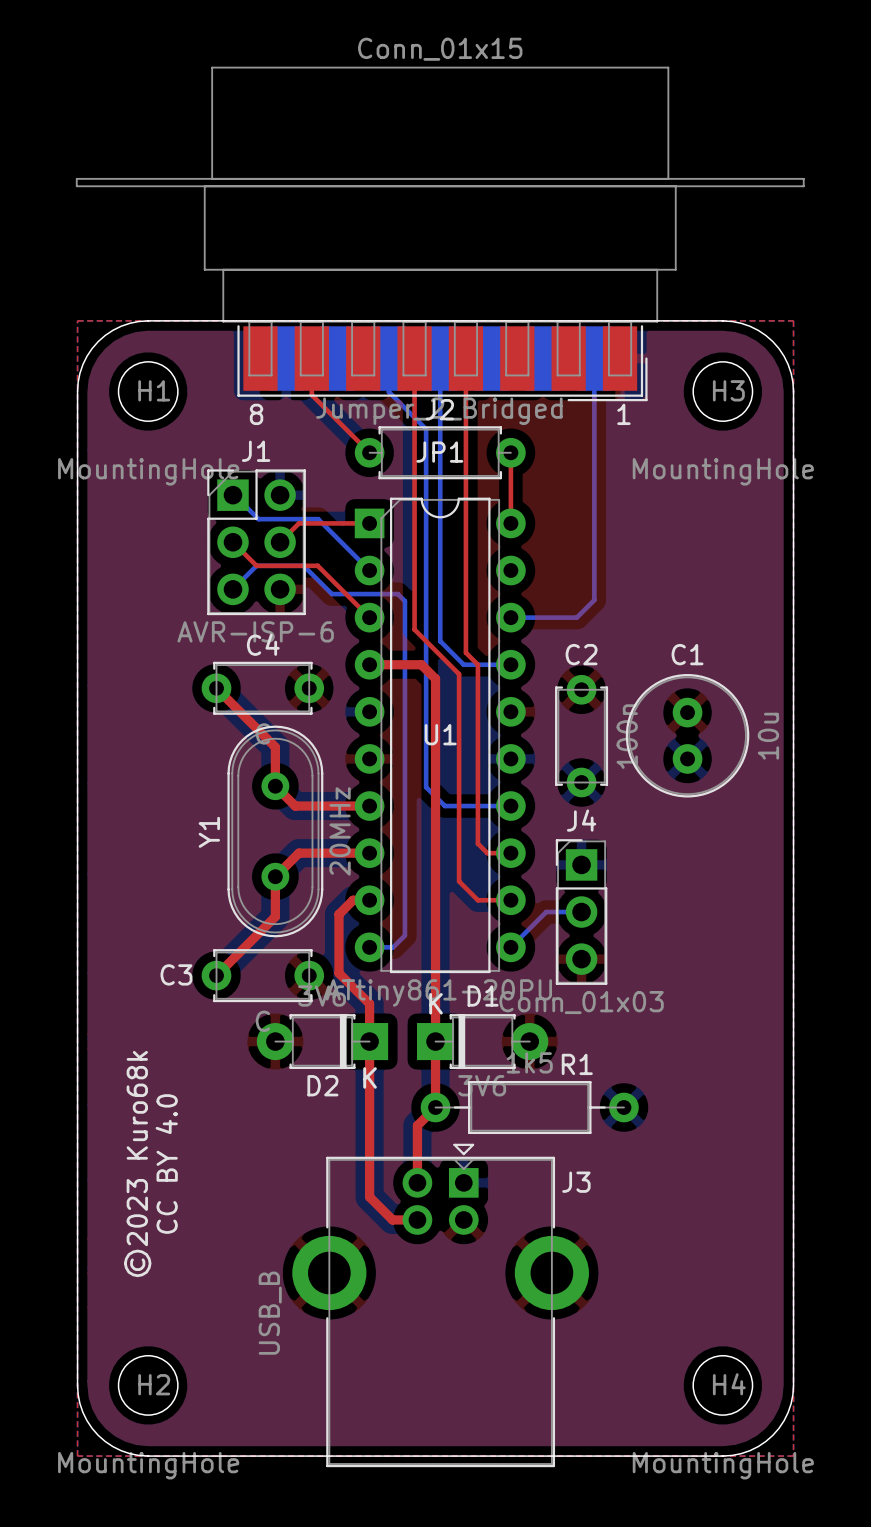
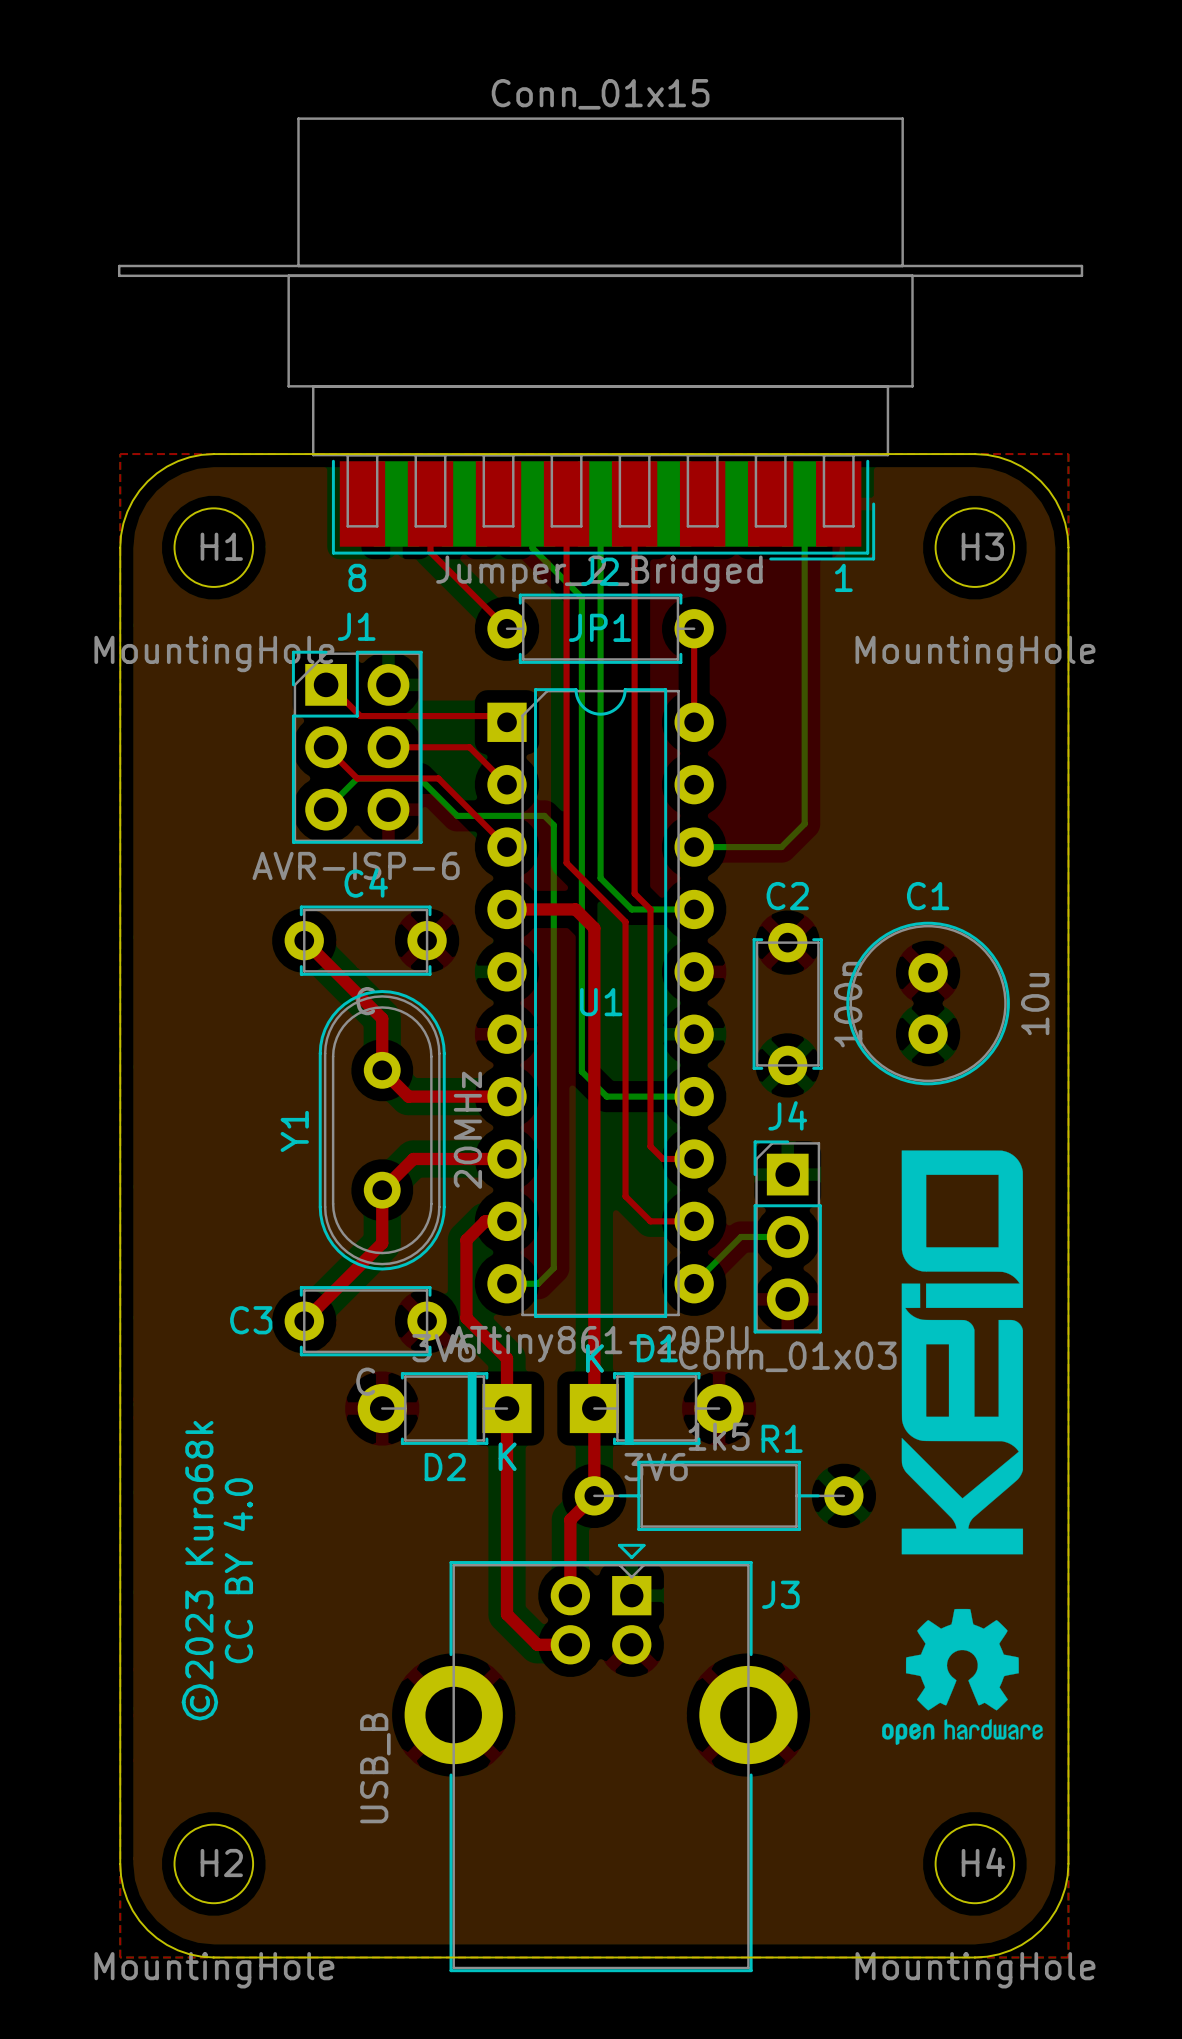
top track: none -> (326, 684) (329, 684) (360, 716) (500, 716) (507, 722)
bottom track: (232, 495) (258, 519) (318, 519) (369, 570) -> none
top track: (369, 523) (298, 523) (280, 542) -> (507, 784) (469, 747) (388, 747)
drawing: none -> [901, 1150, 1024, 1555]
drawing: none -> [882, 1608, 1043, 1745]

